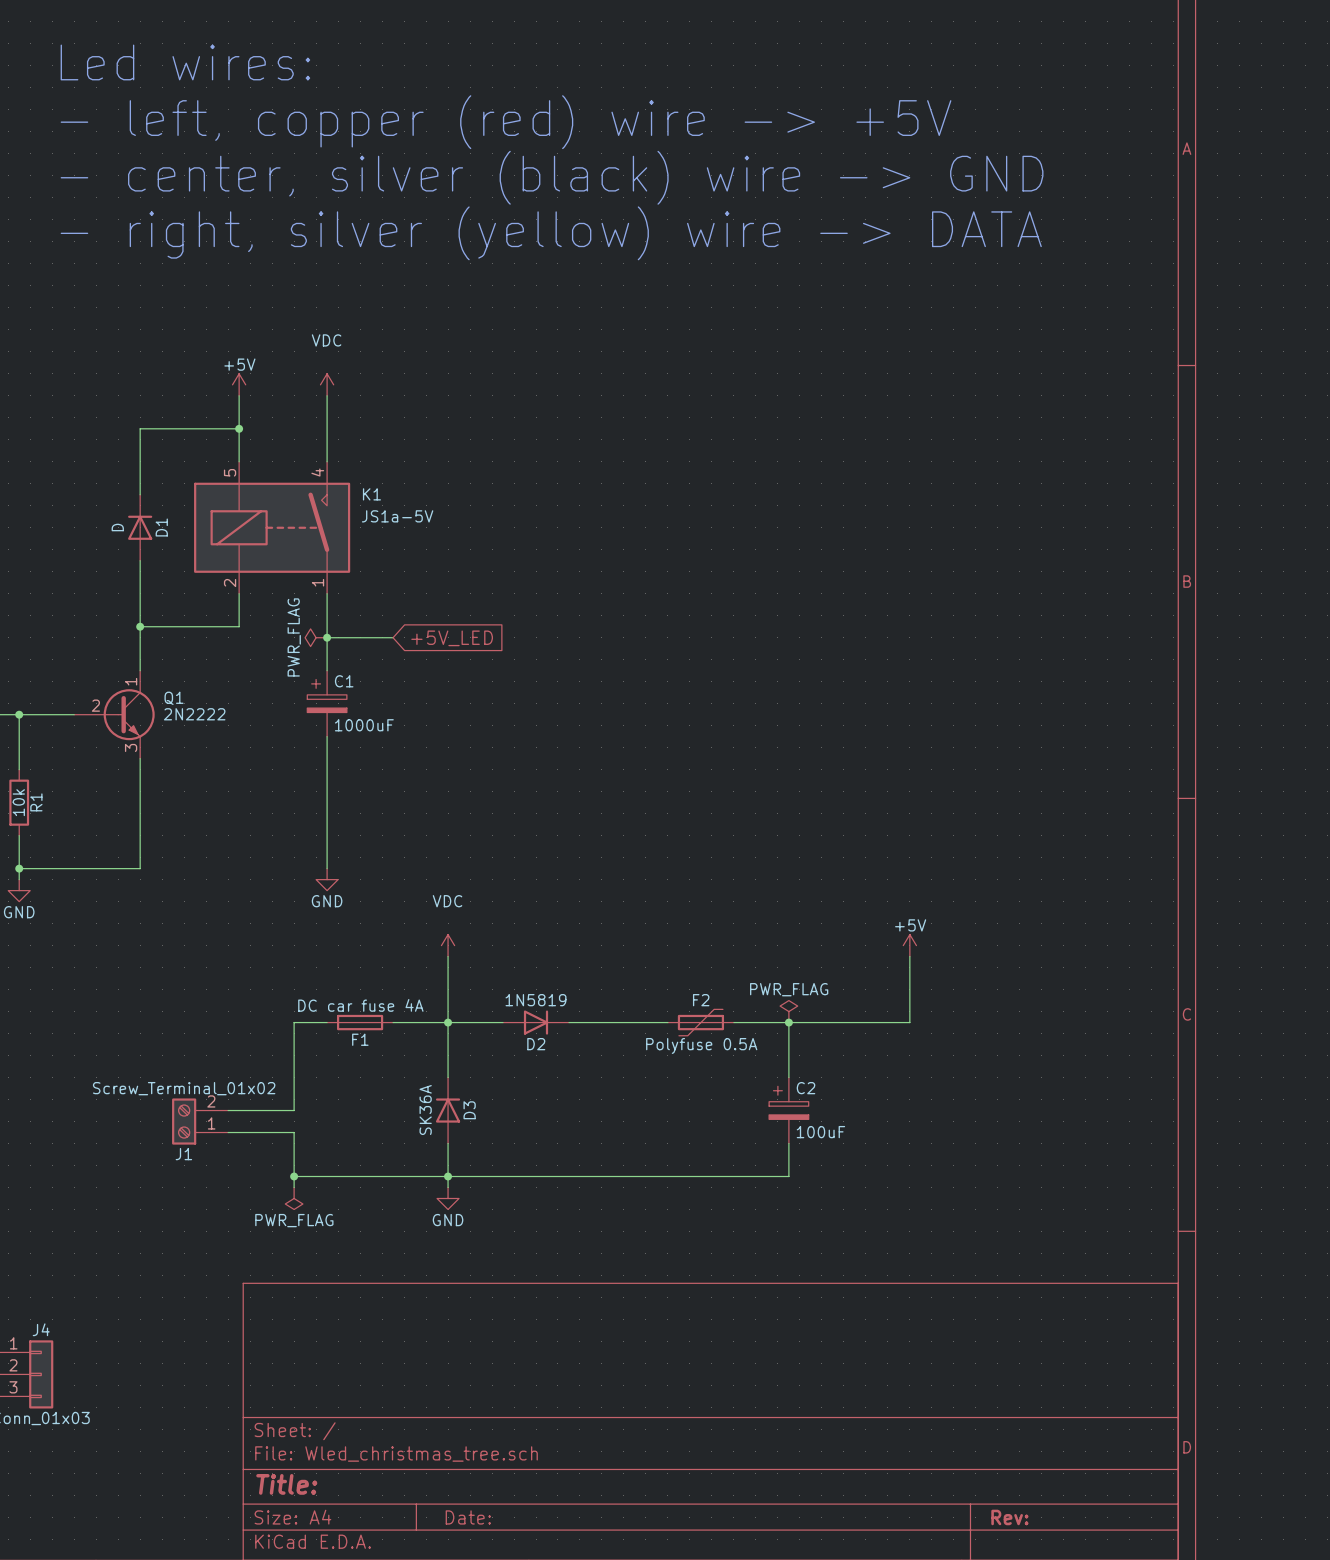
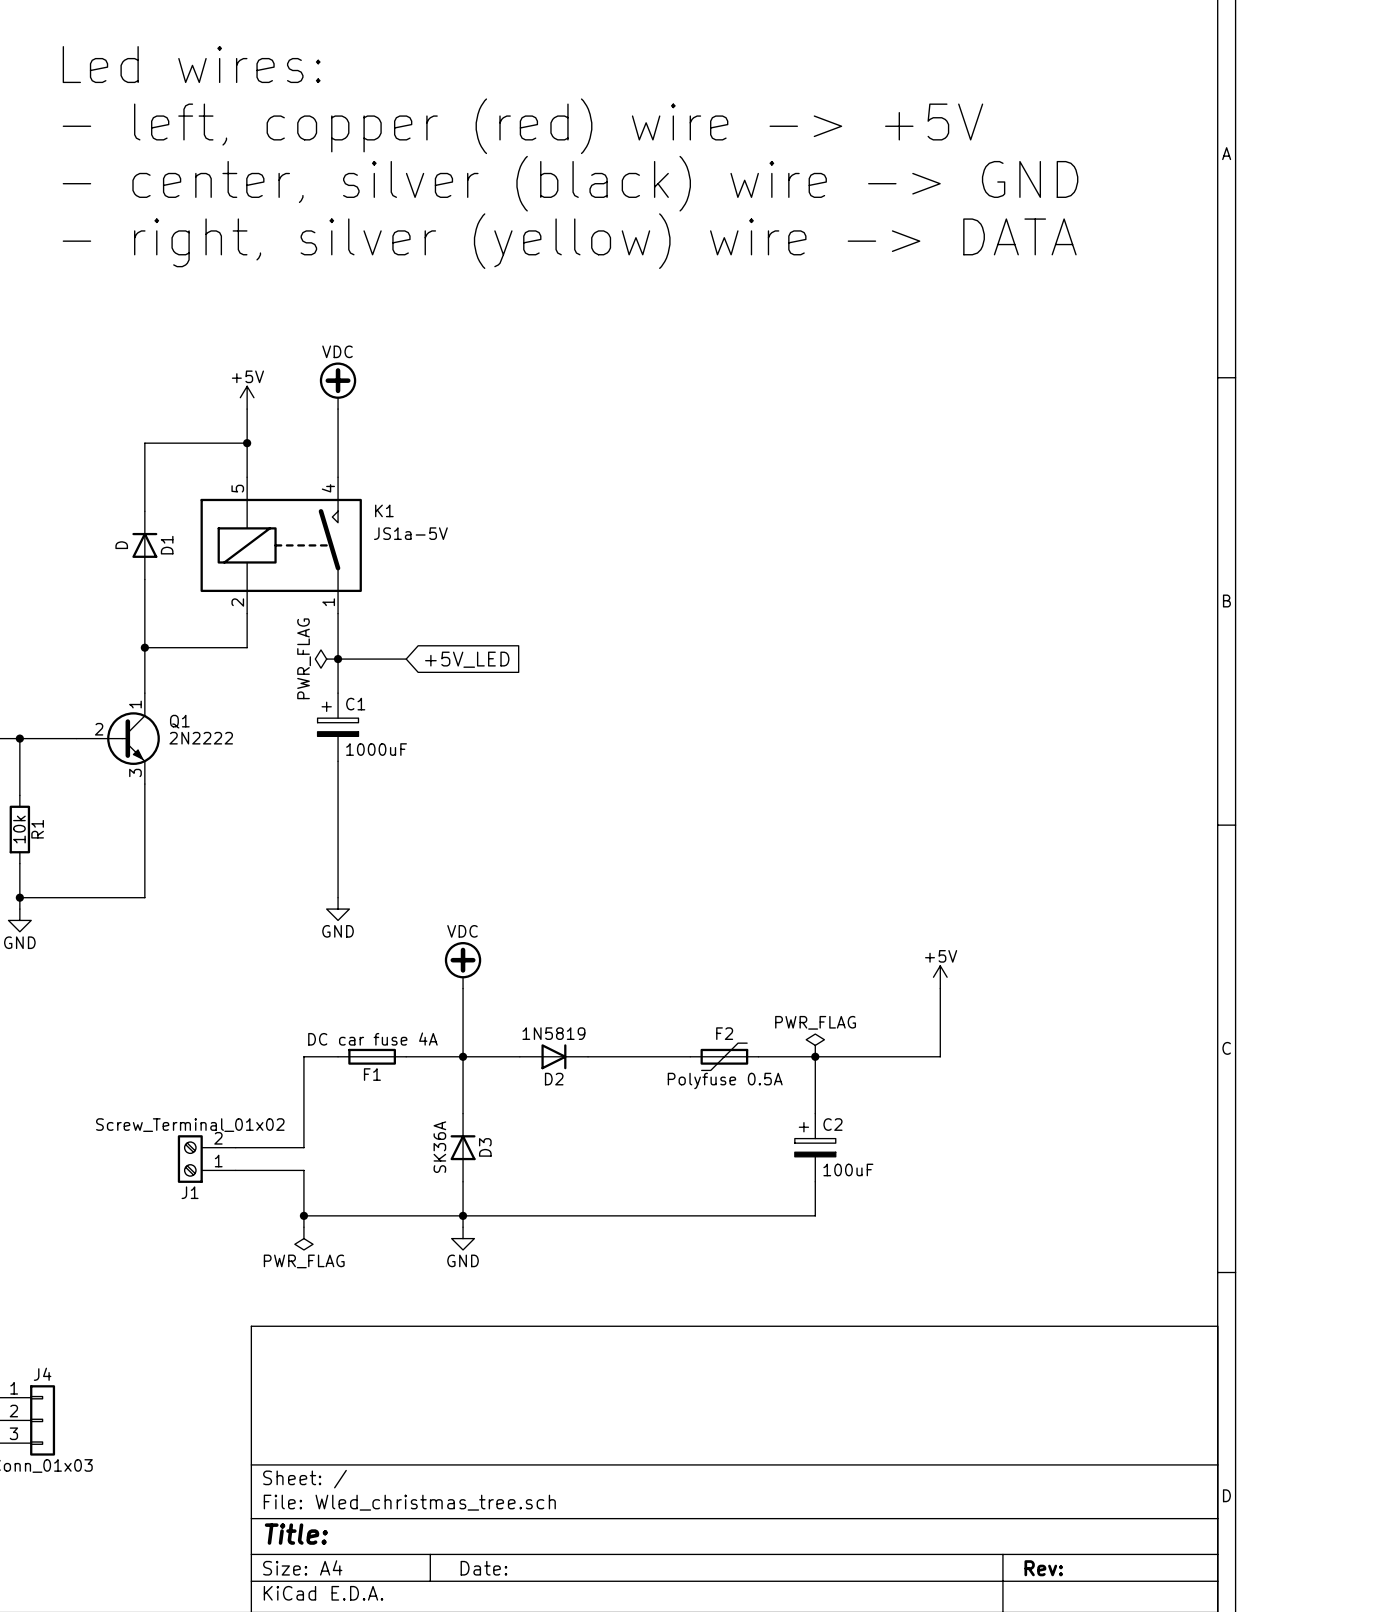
power symbol: none -> VDC (338, 385)
power symbol: VDC (327, 384) -> none
power symbol: none -> VDC (463, 965)
power symbol: VDC (448, 945) -> none

